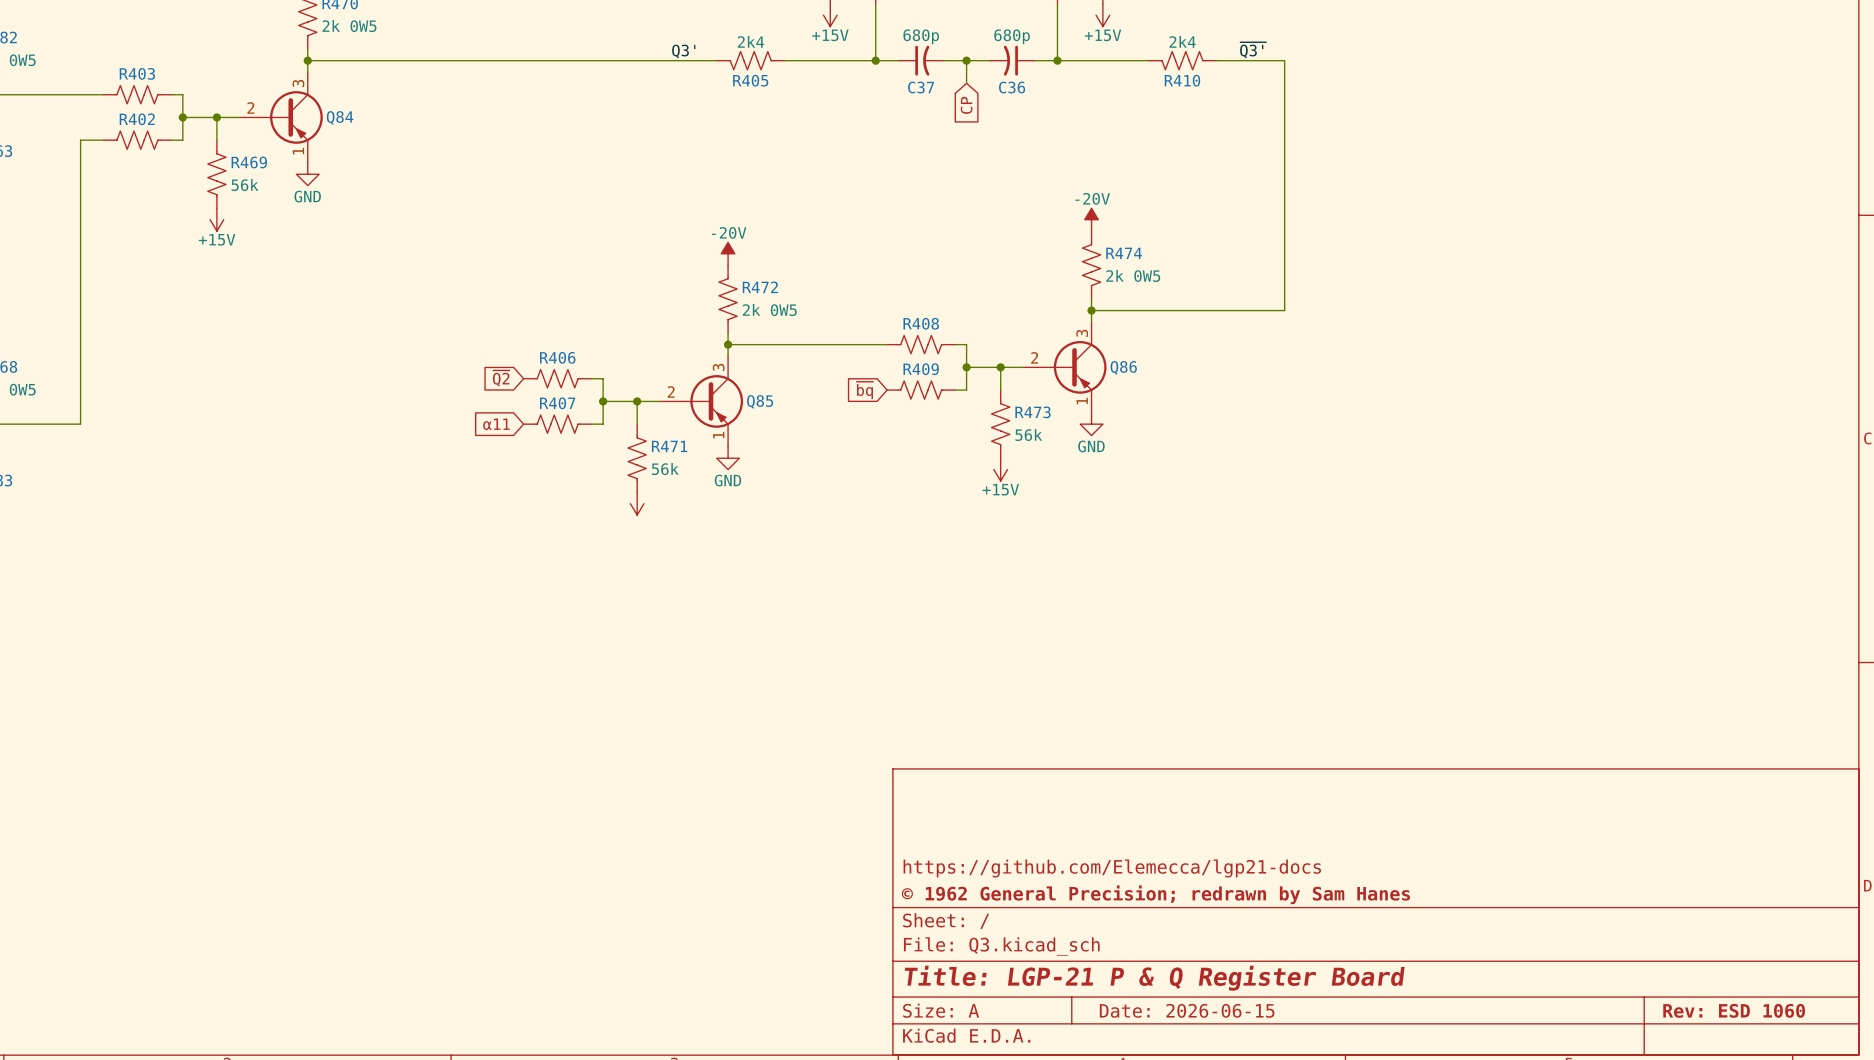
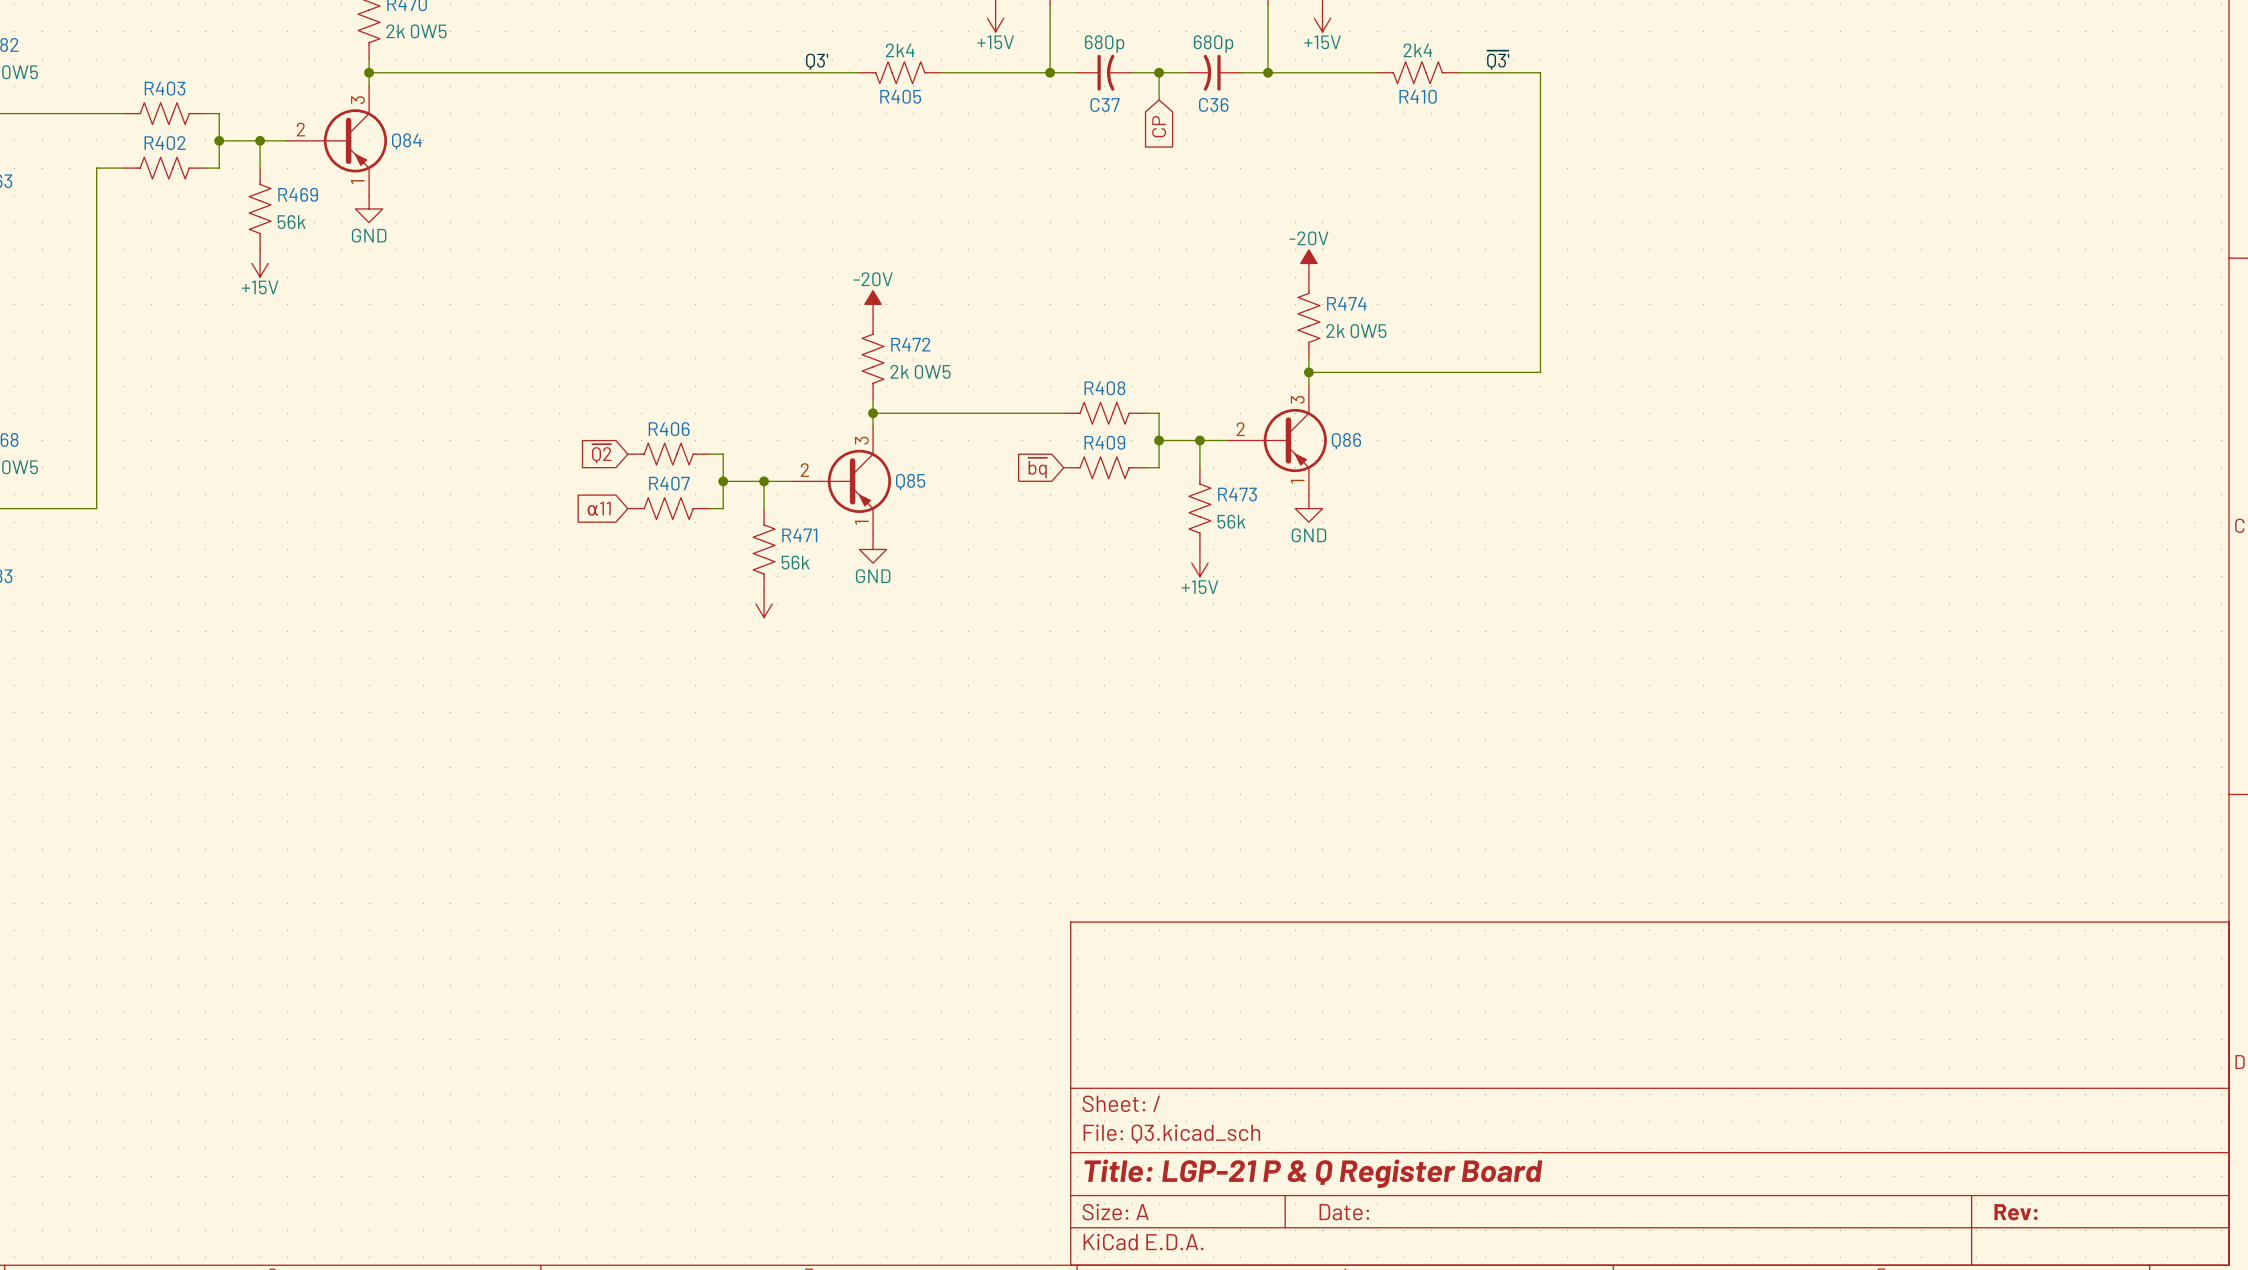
title block: https://github.com/Elemecca/lgp21-docs (1112, 868) -> none
title block: © 1962 General Precision; redrawn by Sam Hanes (1155, 894) -> none
title block: Date: 2026-06-15 (1187, 1010) -> Date: (1344, 1212)
title block: Rev: ESD 1060 (1734, 1010) -> Rev: (2016, 1212)

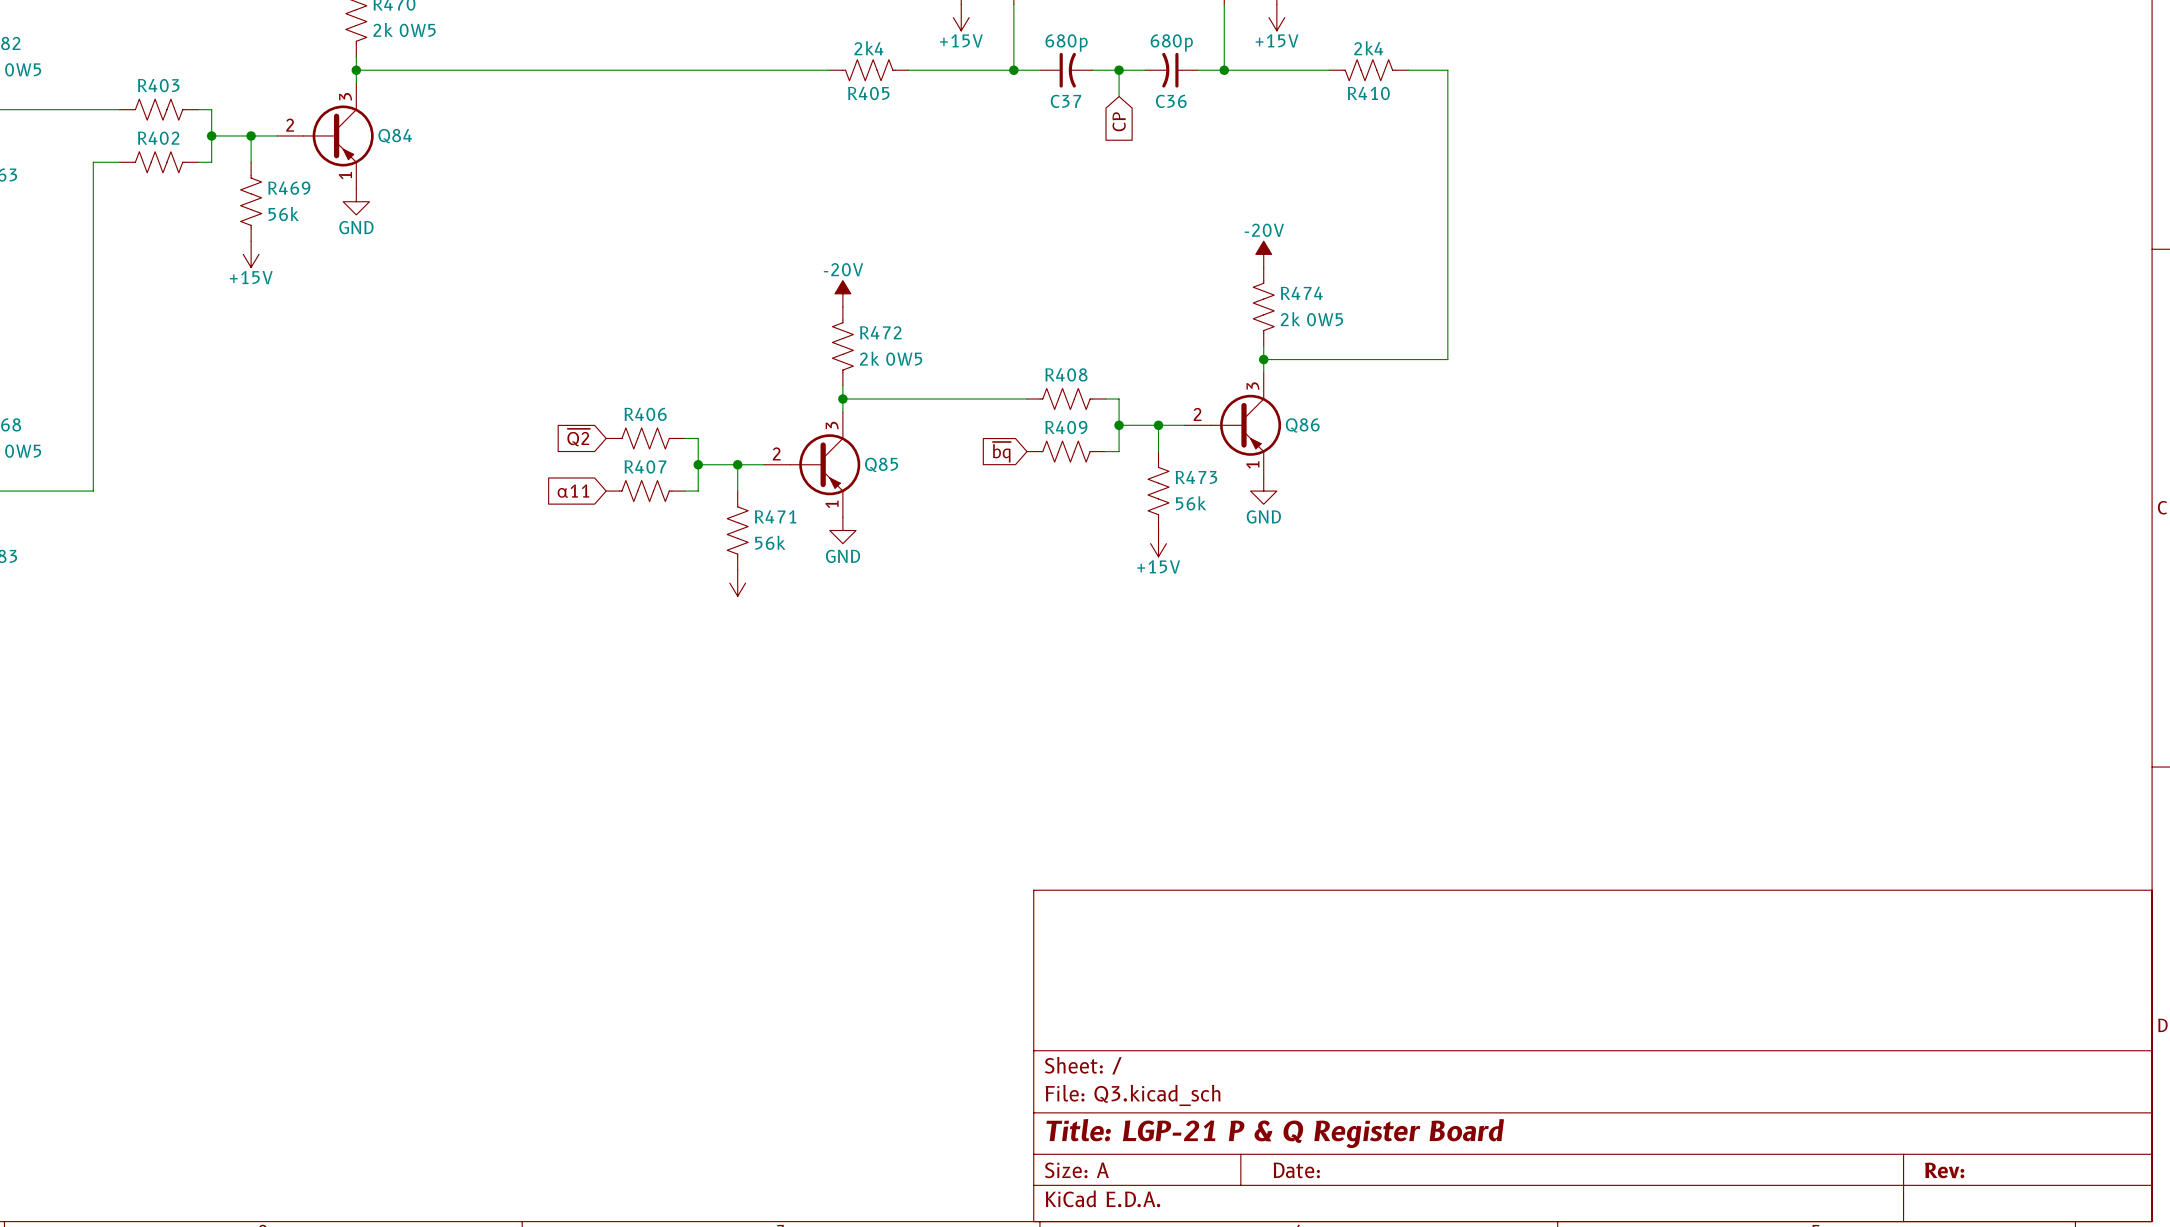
label: ~{Q3'} (1498, 60) -> none
label: Q3' (817, 61) -> none
wire: (1499, 72) (1540, 72) (1540, 372) (1499, 372) -> (1447, 70) (1447, 359)

